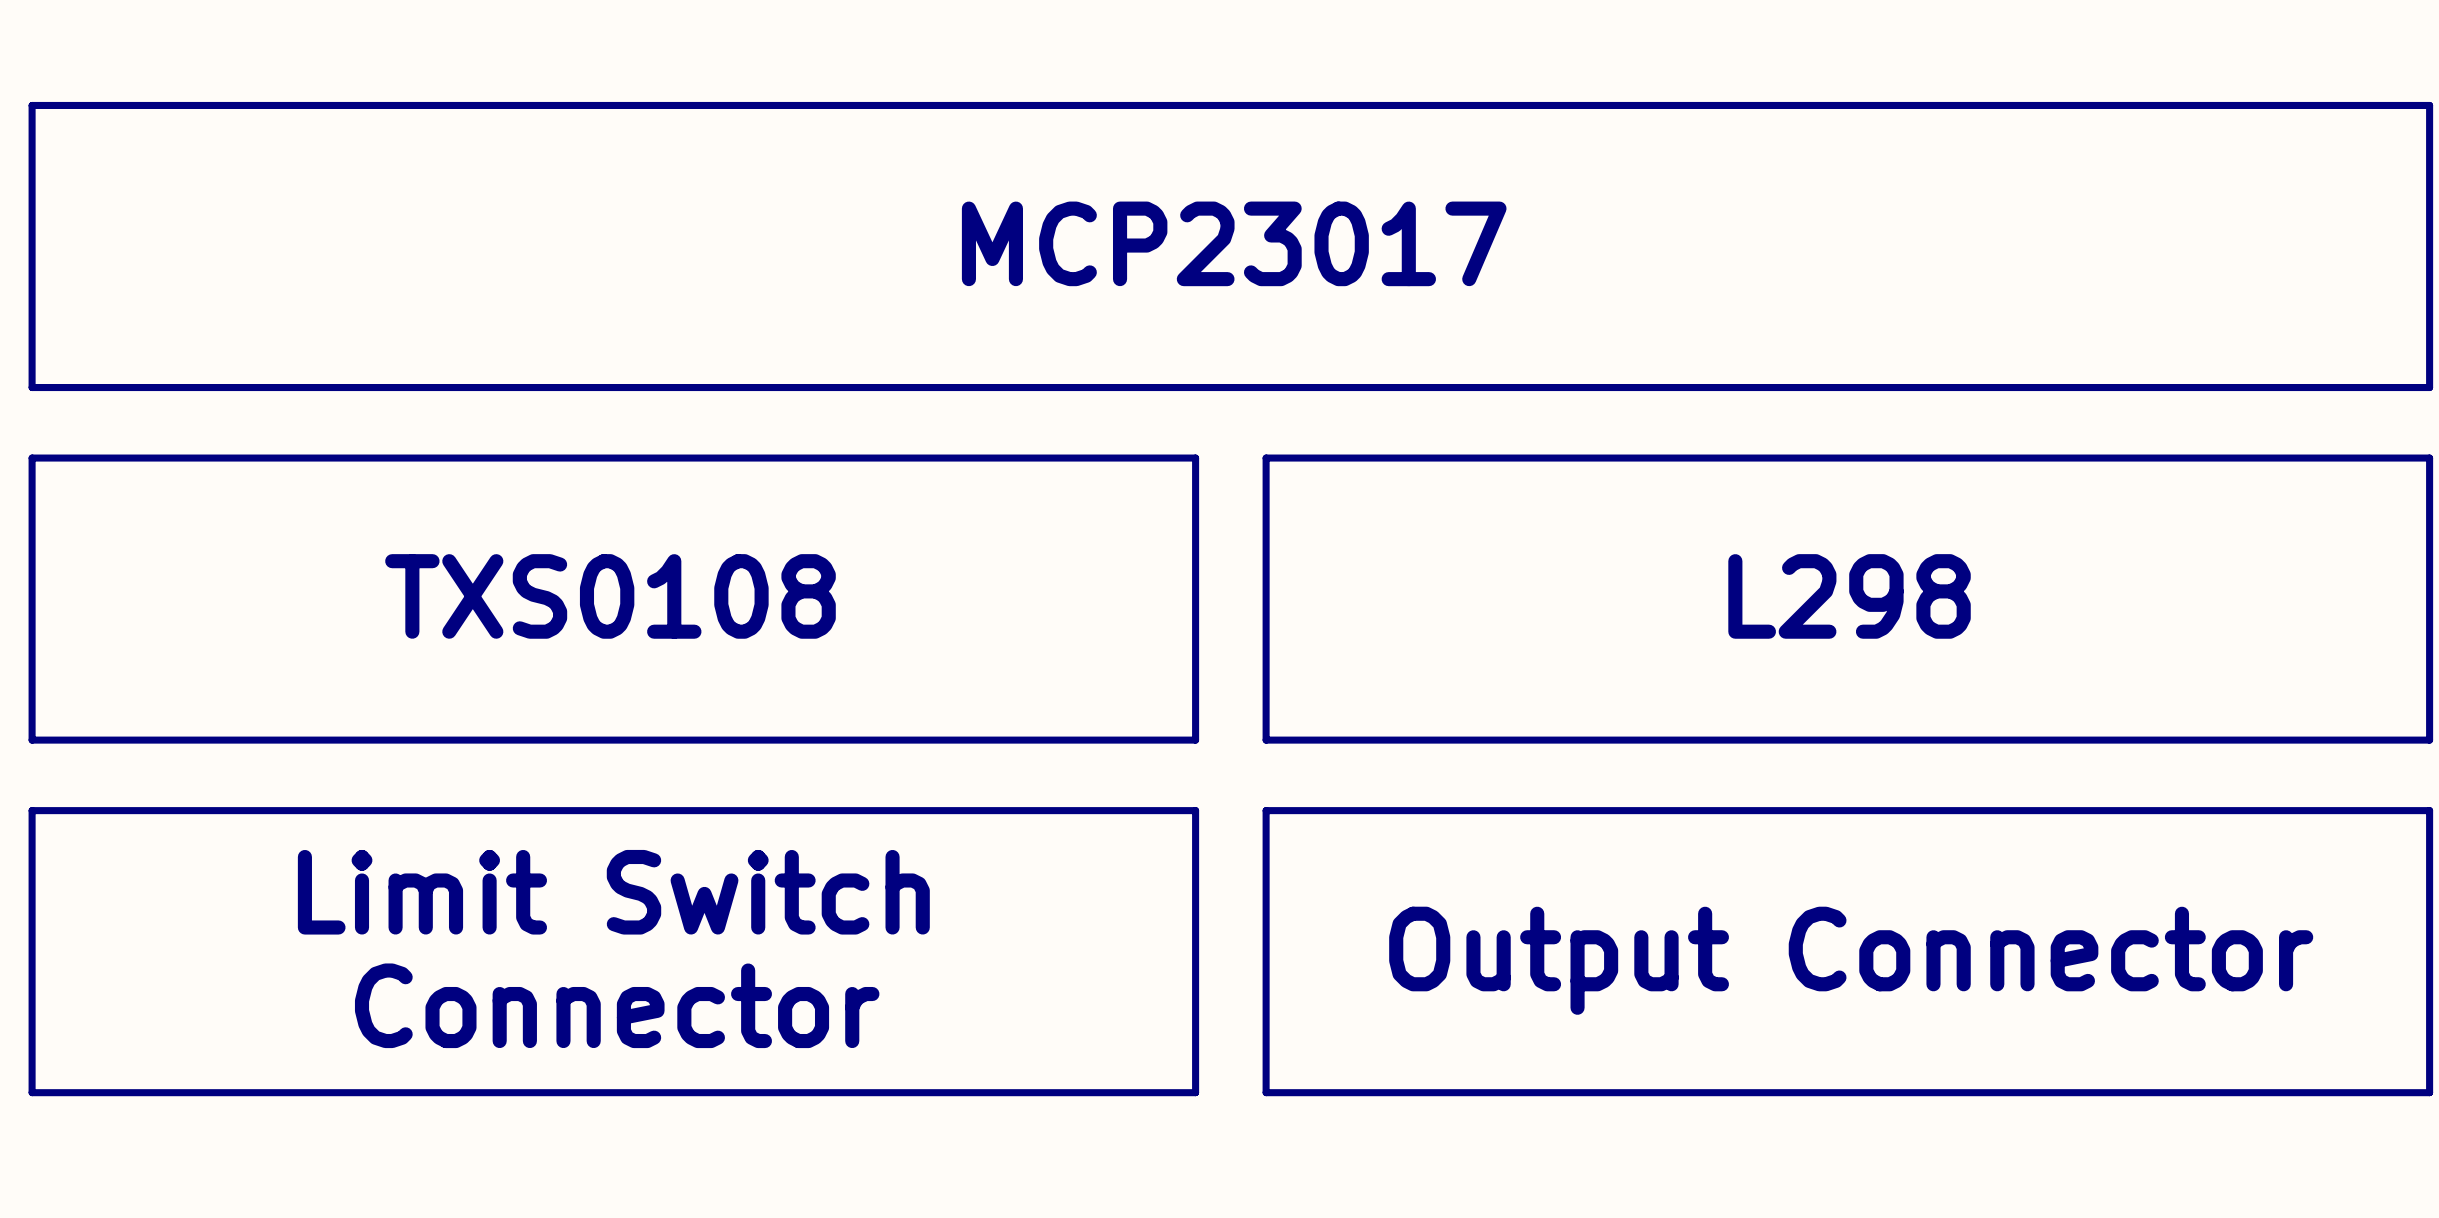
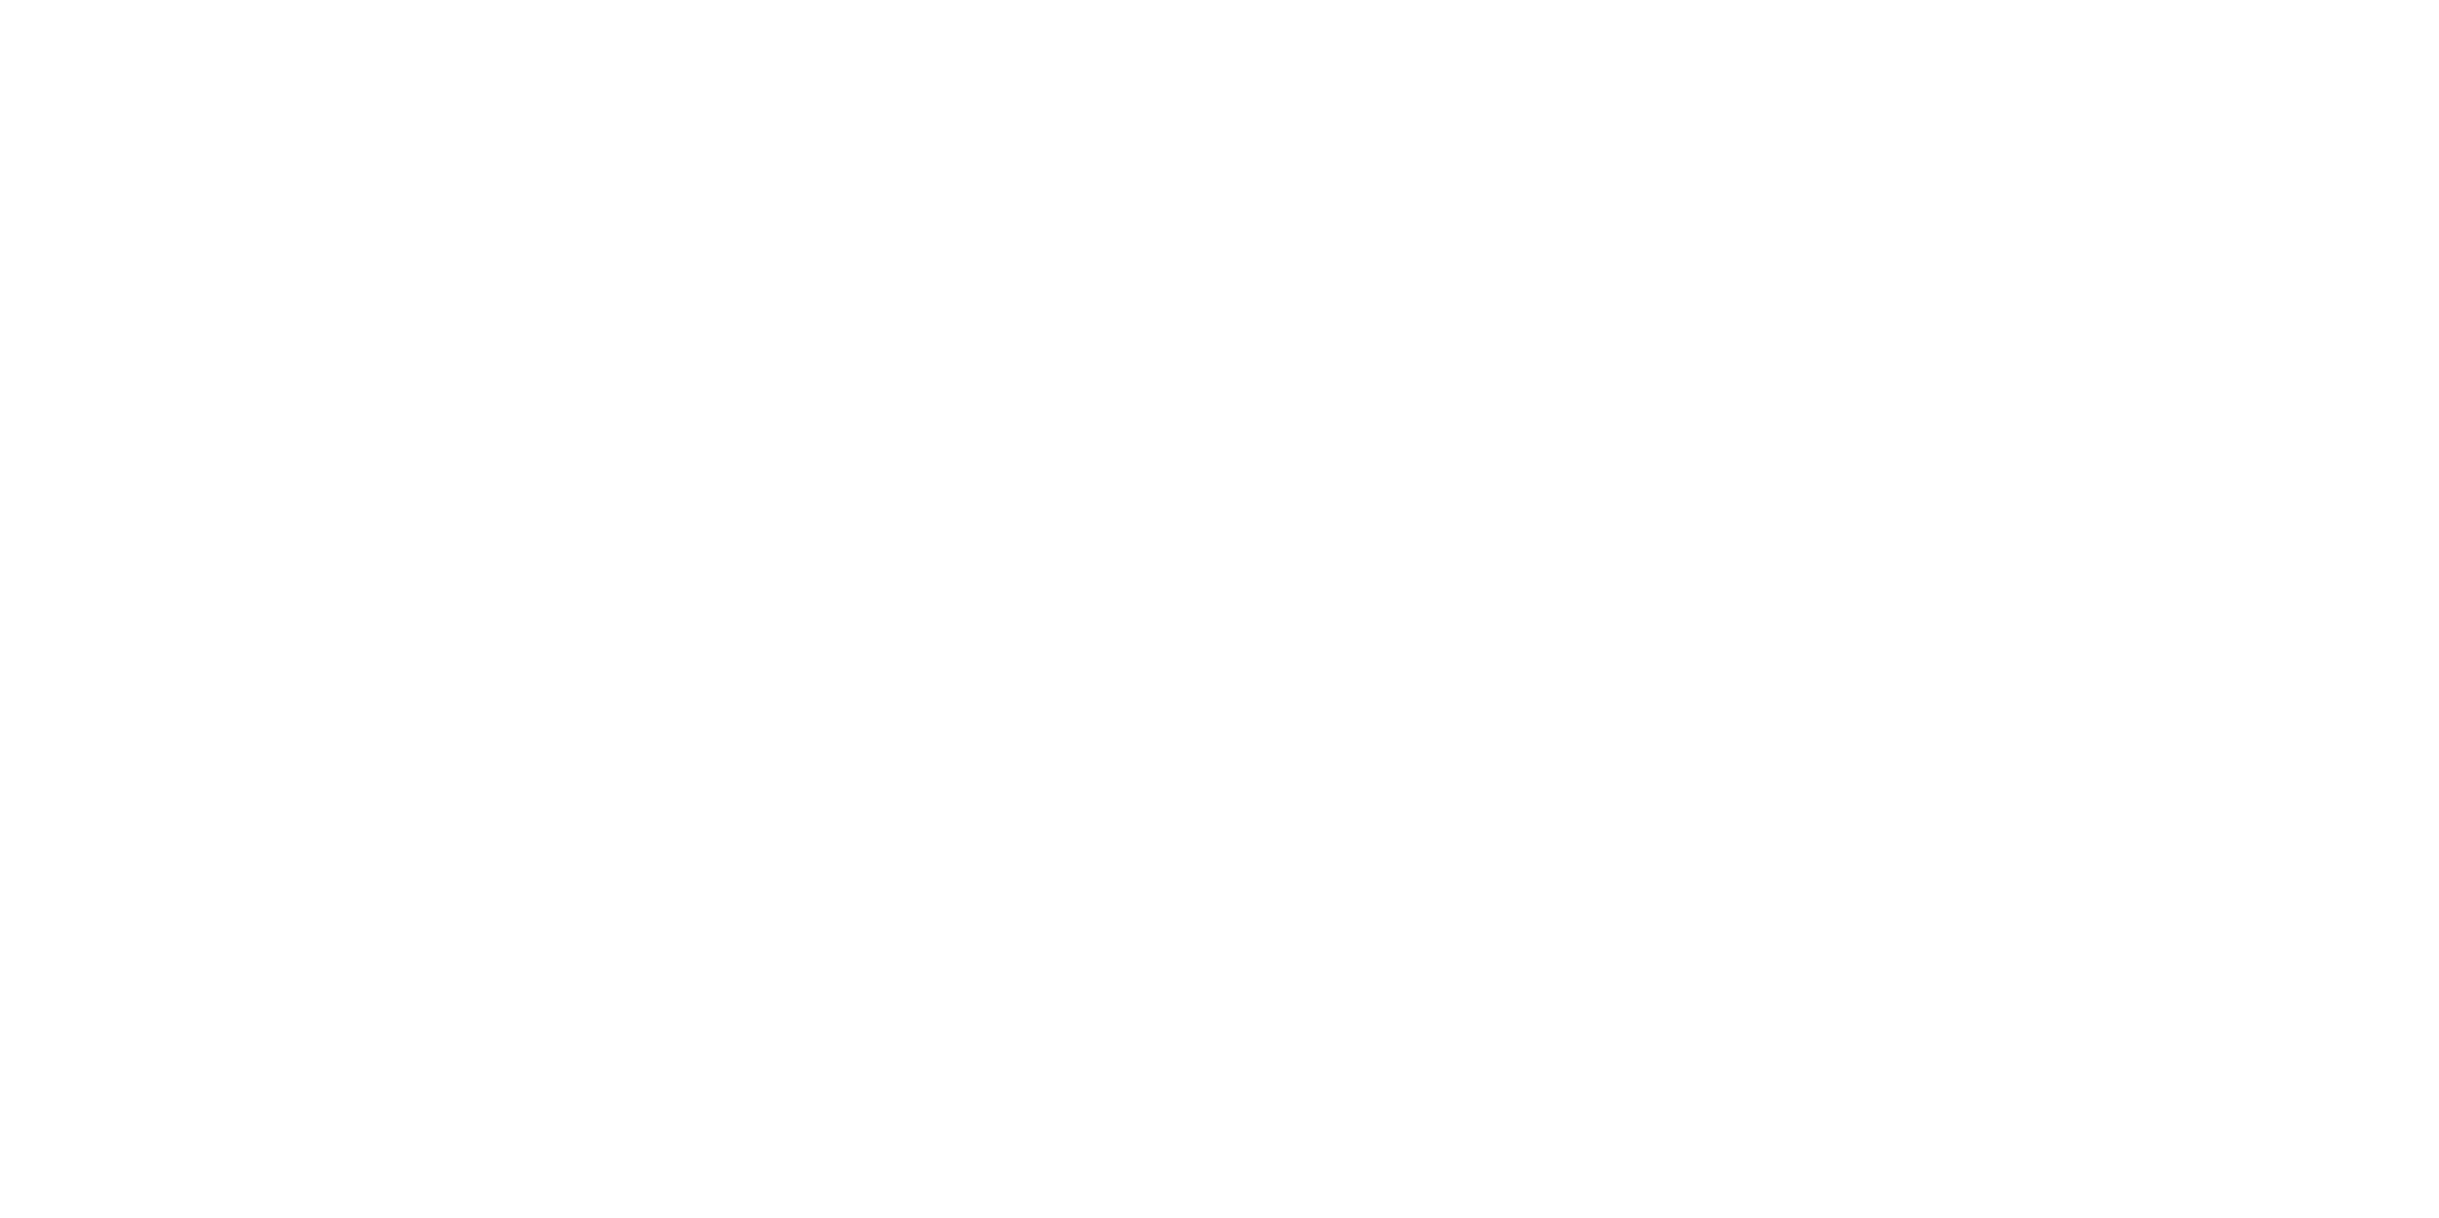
line: (32, 105) (2429, 105) (2429, 387) (32, 387) (32, 105) -> none
text: MCP23017 (1234, 243) -> none
line: (32, 458) (1195, 458) (1195, 740) (32, 740) (32, 458) -> none
line: (1266, 458) (2429, 458) (2429, 740) (1266, 740) (1266, 458) -> none
text: TXS0108 (610, 596) -> none
text: L298 (1849, 596) -> none
line: (32, 810) (32, 1092) (1195, 1092) (1195, 810) (32, 810) -> none
line: (1266, 810) (1266, 1092) (2429, 1092) (2429, 810) (1266, 810) -> none
text: Limit Switch (613, 892) -> none
text: Output Connector (1851, 960) -> none
text: Connector (617, 1005) -> none

